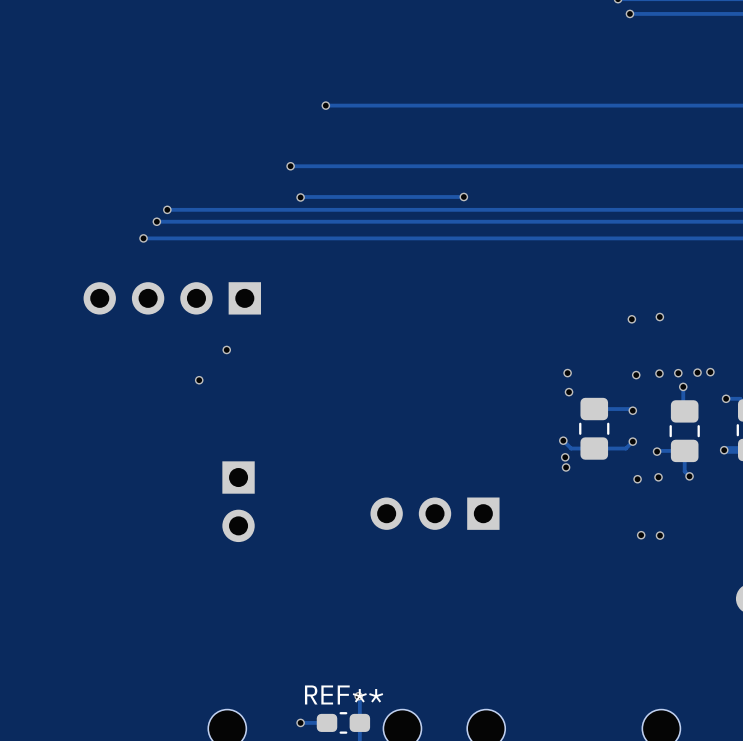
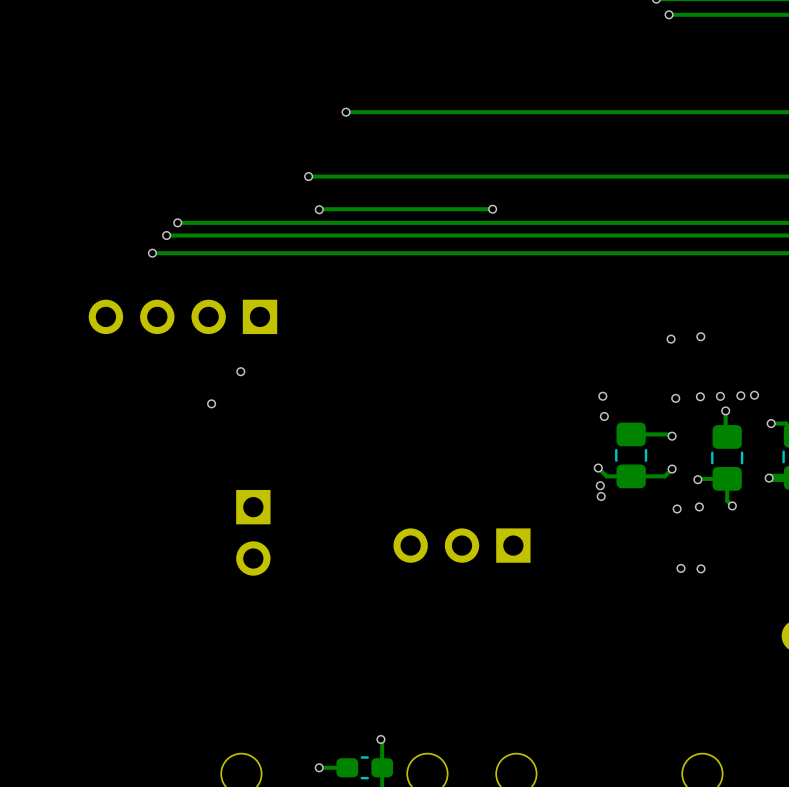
REF** name: REF** (344, 694) -> none

